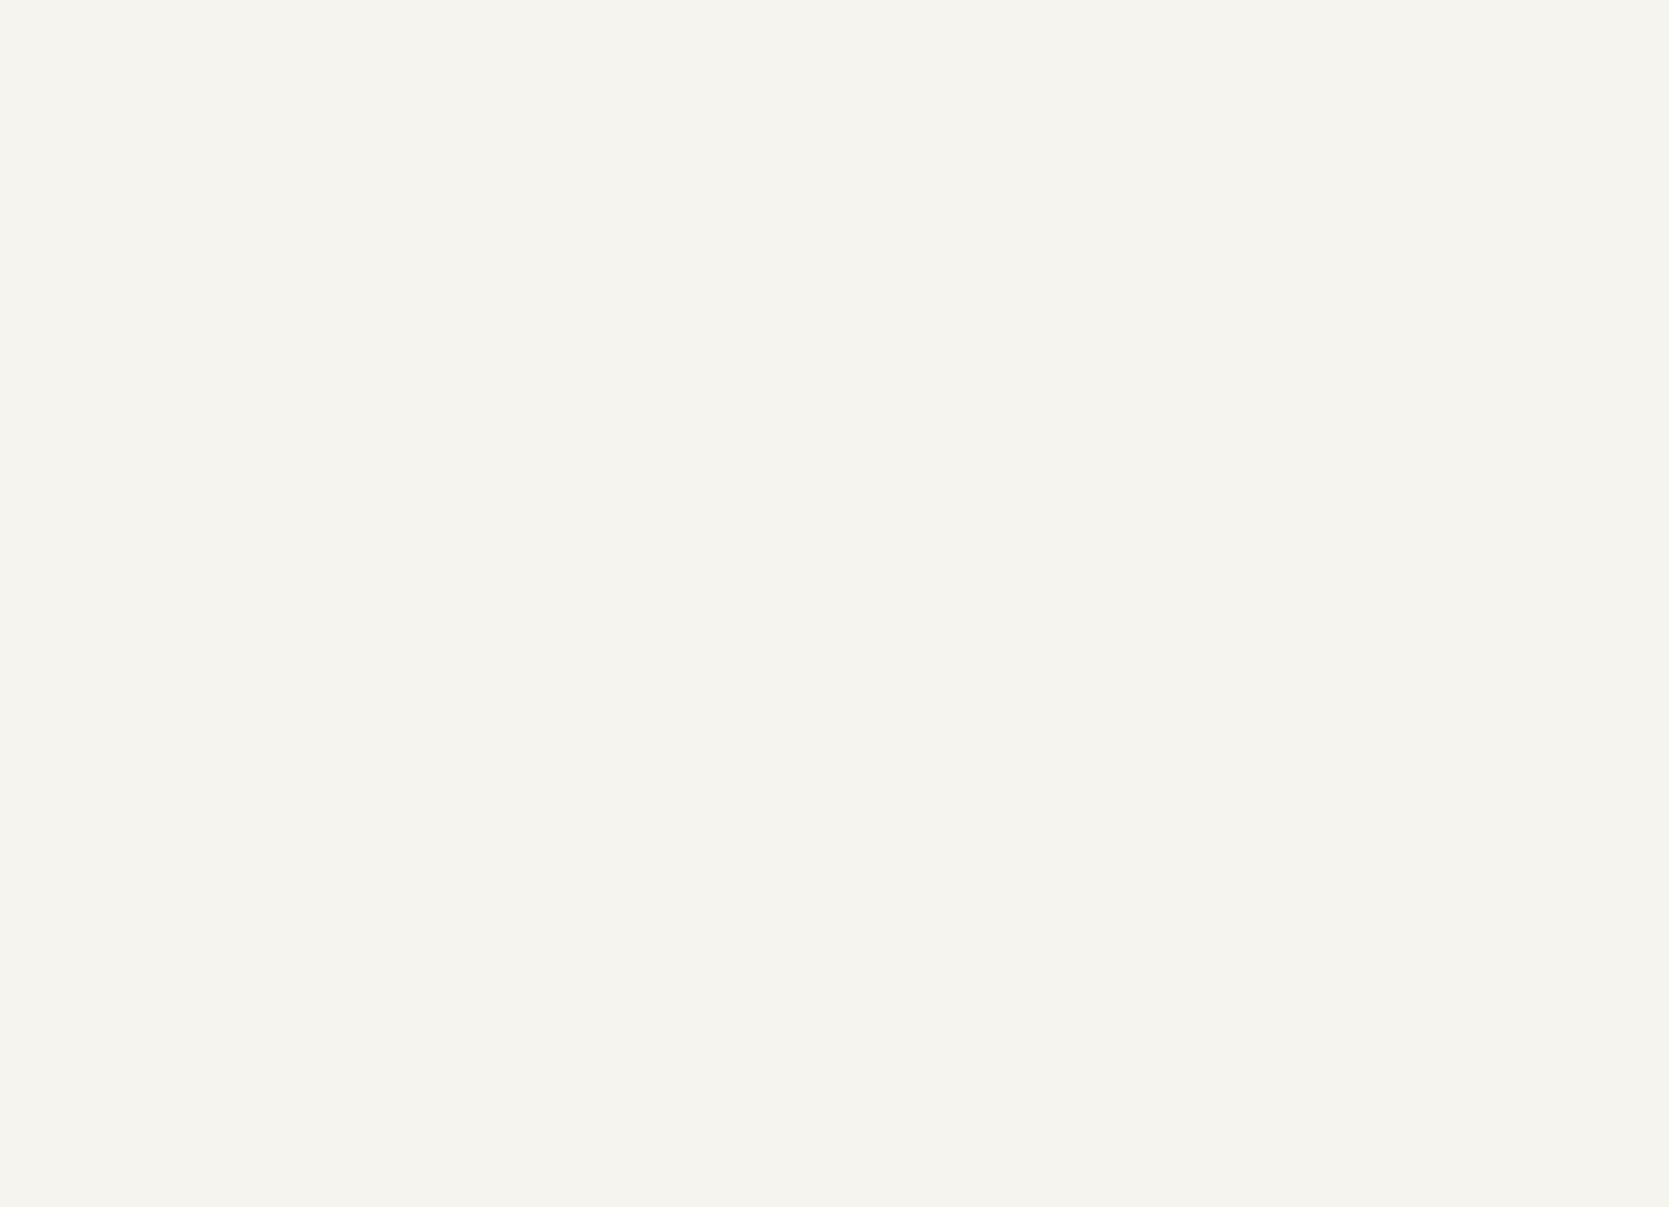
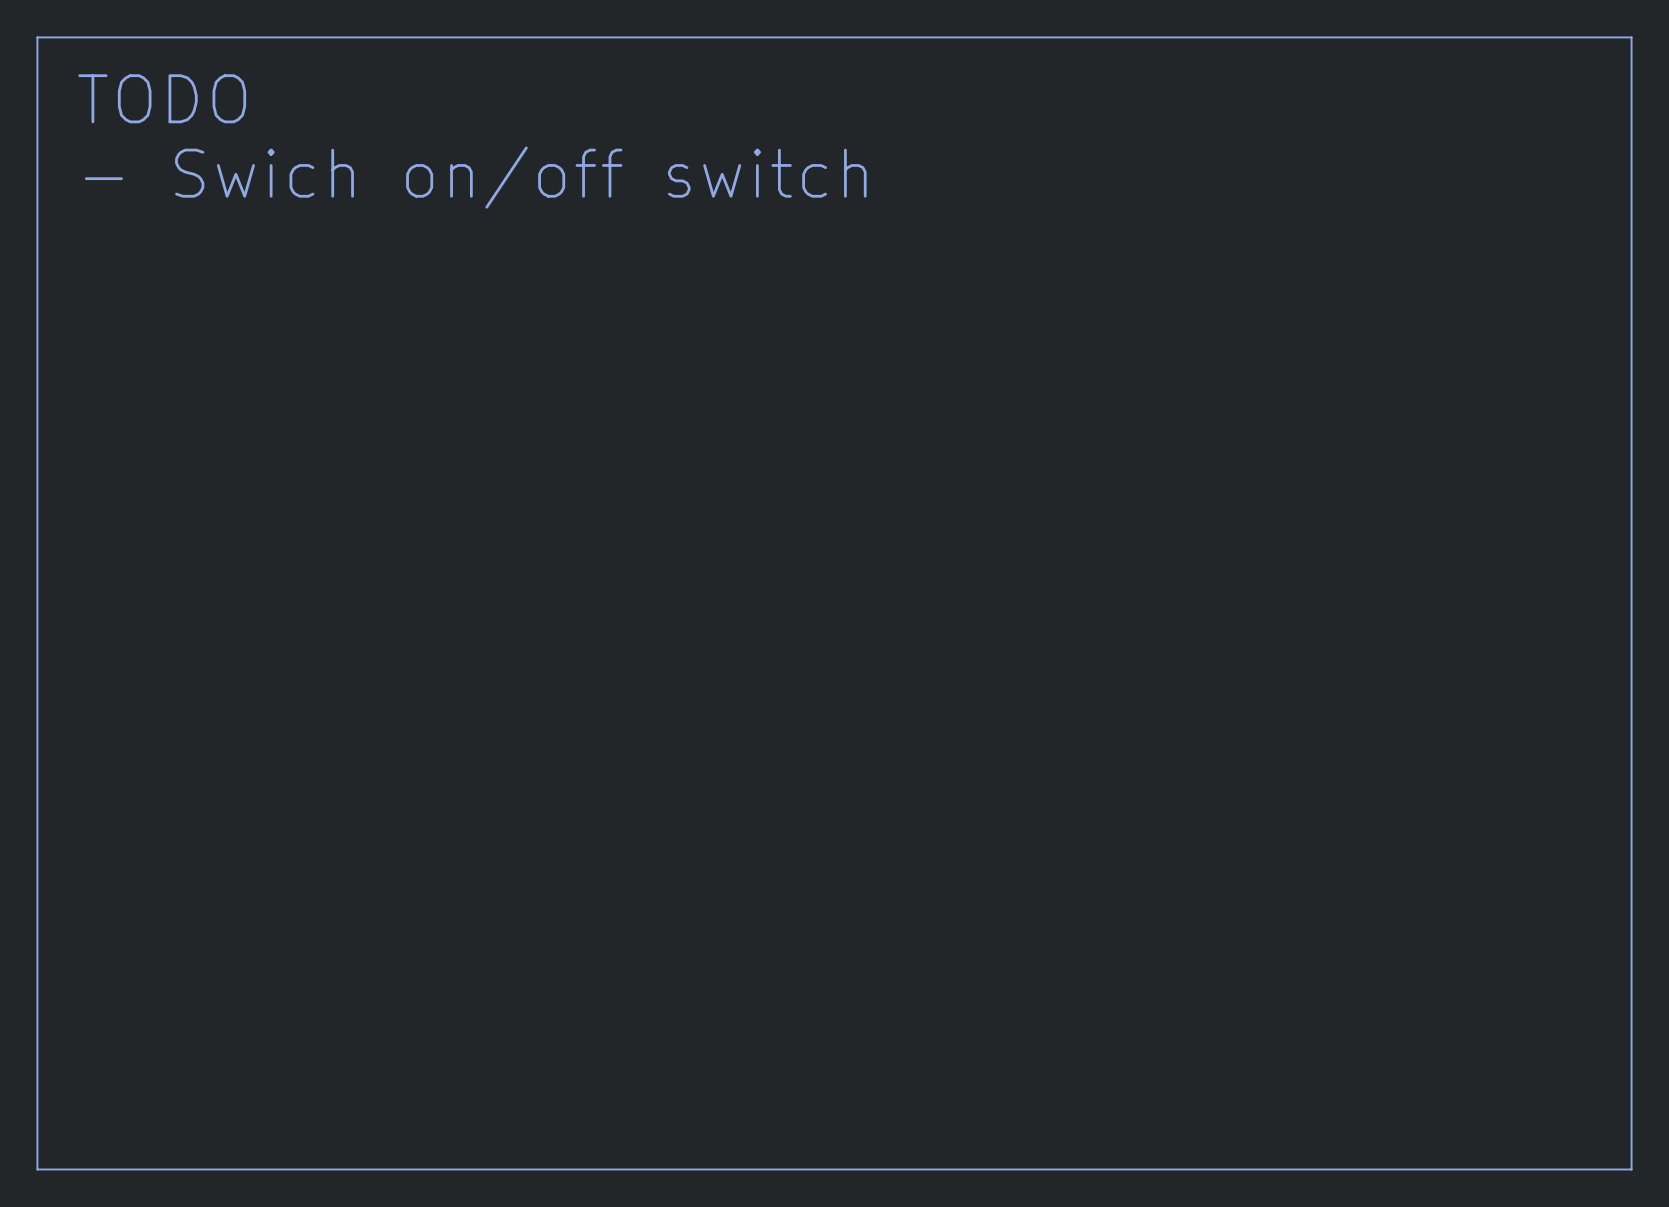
line: none -> (37, 37) (1631, 37) (1631, 1169) (37, 1169) (37, 37)
text: none -> TODO (162, 98)
text: none -> - Swich on/off switch (475, 177)

